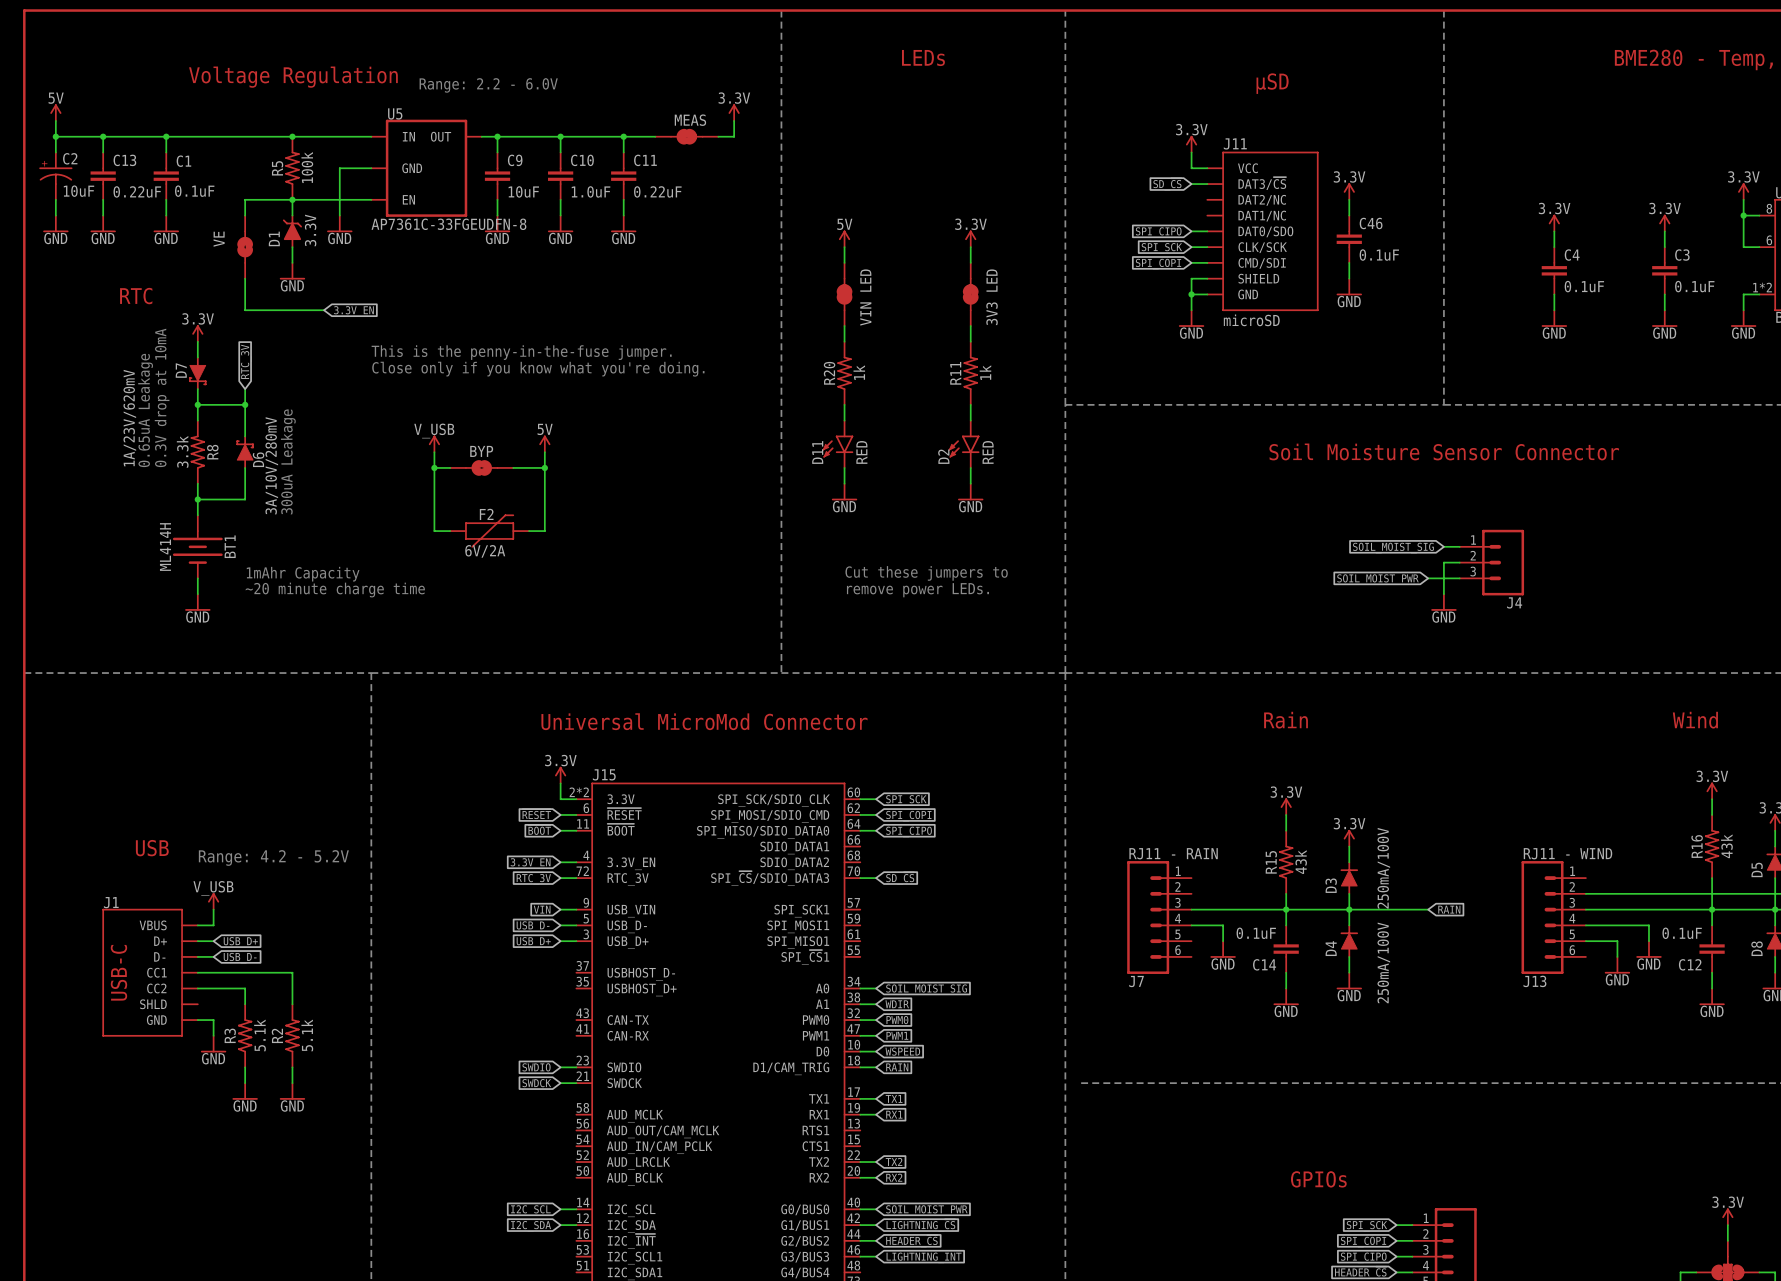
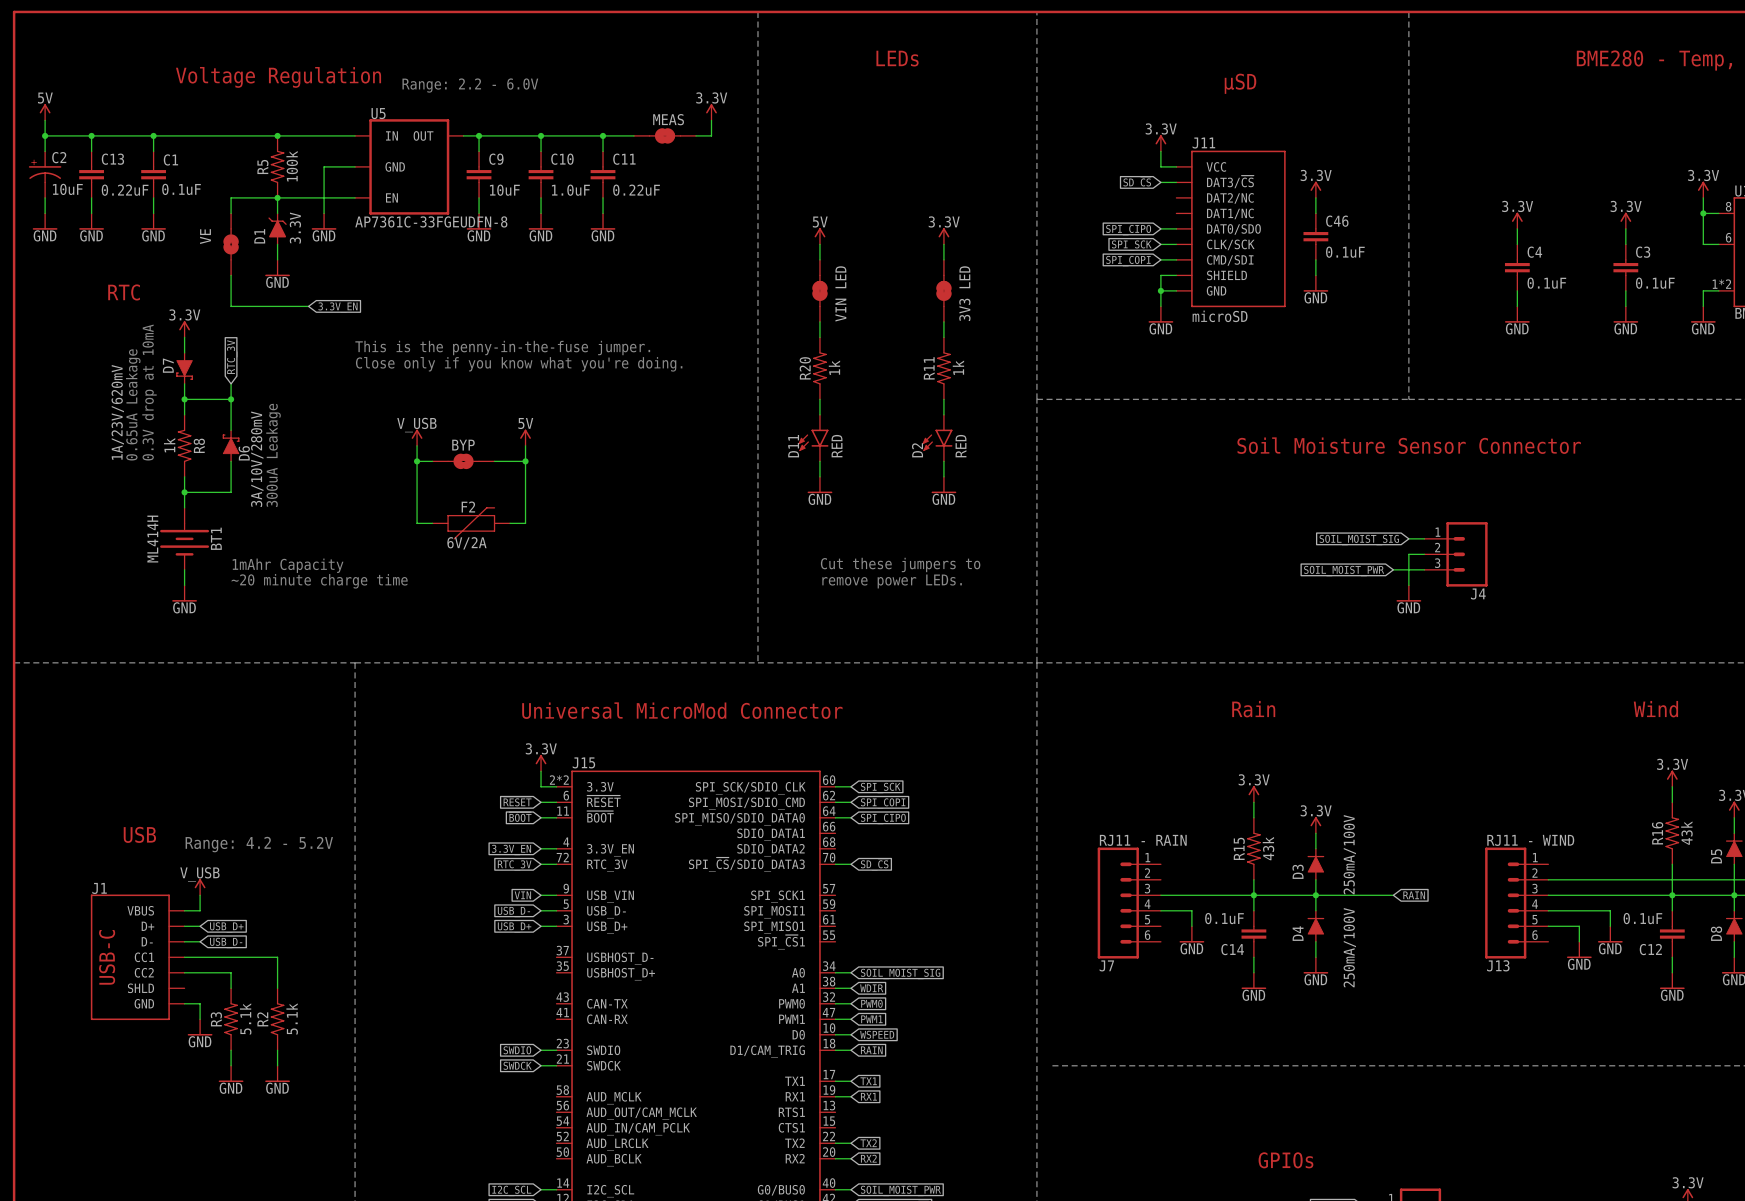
R8 value: 3.3k (182, 451) -> 1k (169, 445)

